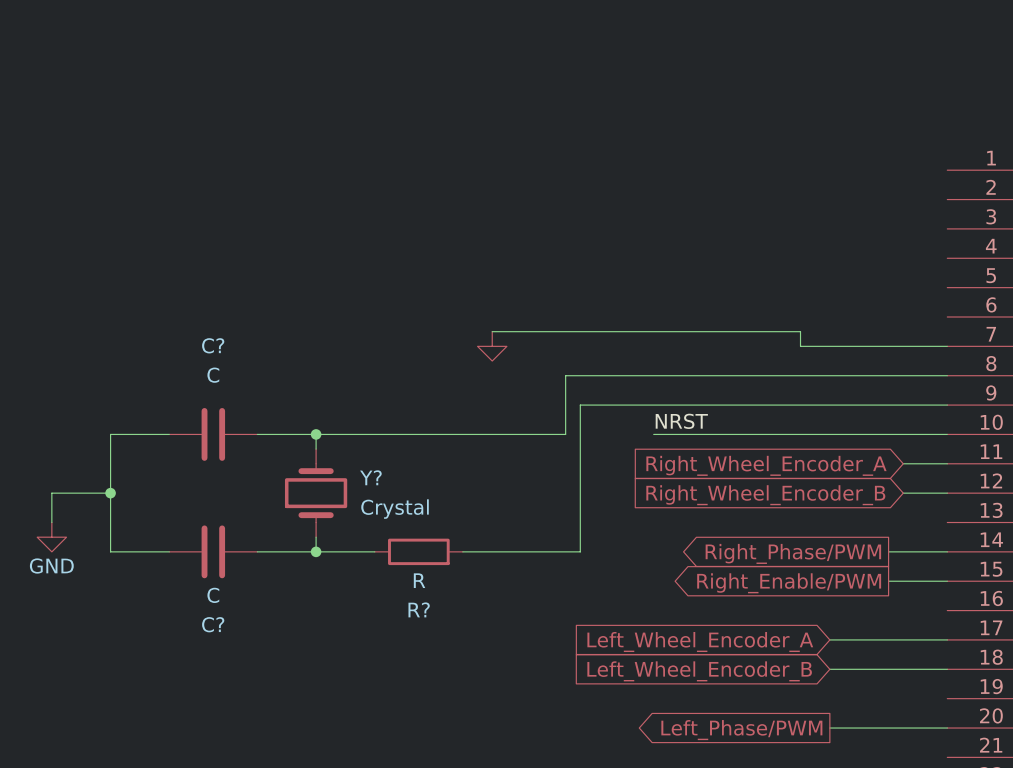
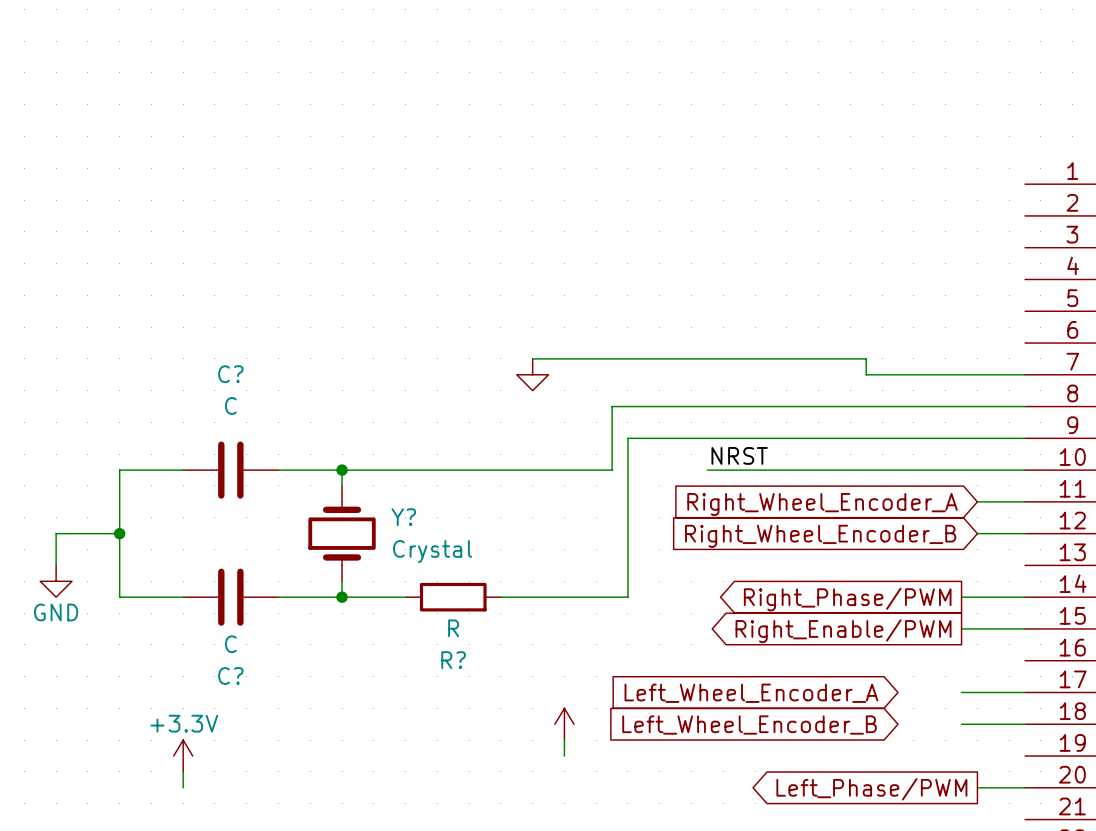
wire: (829, 639) (888, 639) -> none
power symbol: none -> (564, 724)
wire: (829, 669) (888, 669) -> none
wire: none -> (564, 740) (564, 756)
power symbol: none -> +3.3V (183, 756)
wire: none -> (183, 771) (183, 787)
wire: (829, 728) (903, 728) -> none
global label position: Left_Phase/PWM (741, 730) -> Left_Phase/PWM (871, 789)

